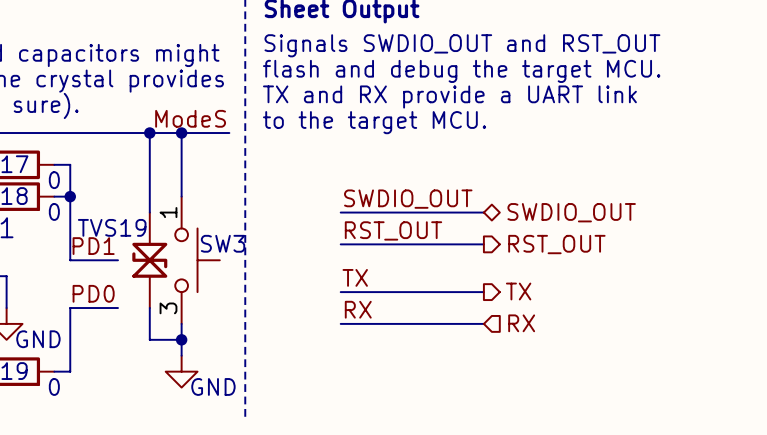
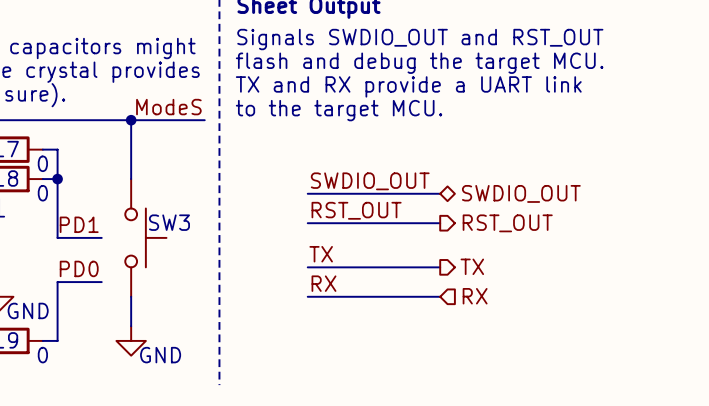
wire: (181, 133) (181, 196) -> none
junction: (181, 133) -> none
SW3 pin number: 1 (168, 212) -> none
TVS19: (149, 260) -> none
SW3 position: (197, 260) -> (145, 237)
SW3 pin number: 3 (168, 308) -> none
wire: (181, 323) (181, 355) -> none
wire: (149, 339) (181, 339) -> (131, 311) (131, 326)
junction: (181, 339) -> none
power symbol position: GND (181, 371) -> GND (131, 340)

